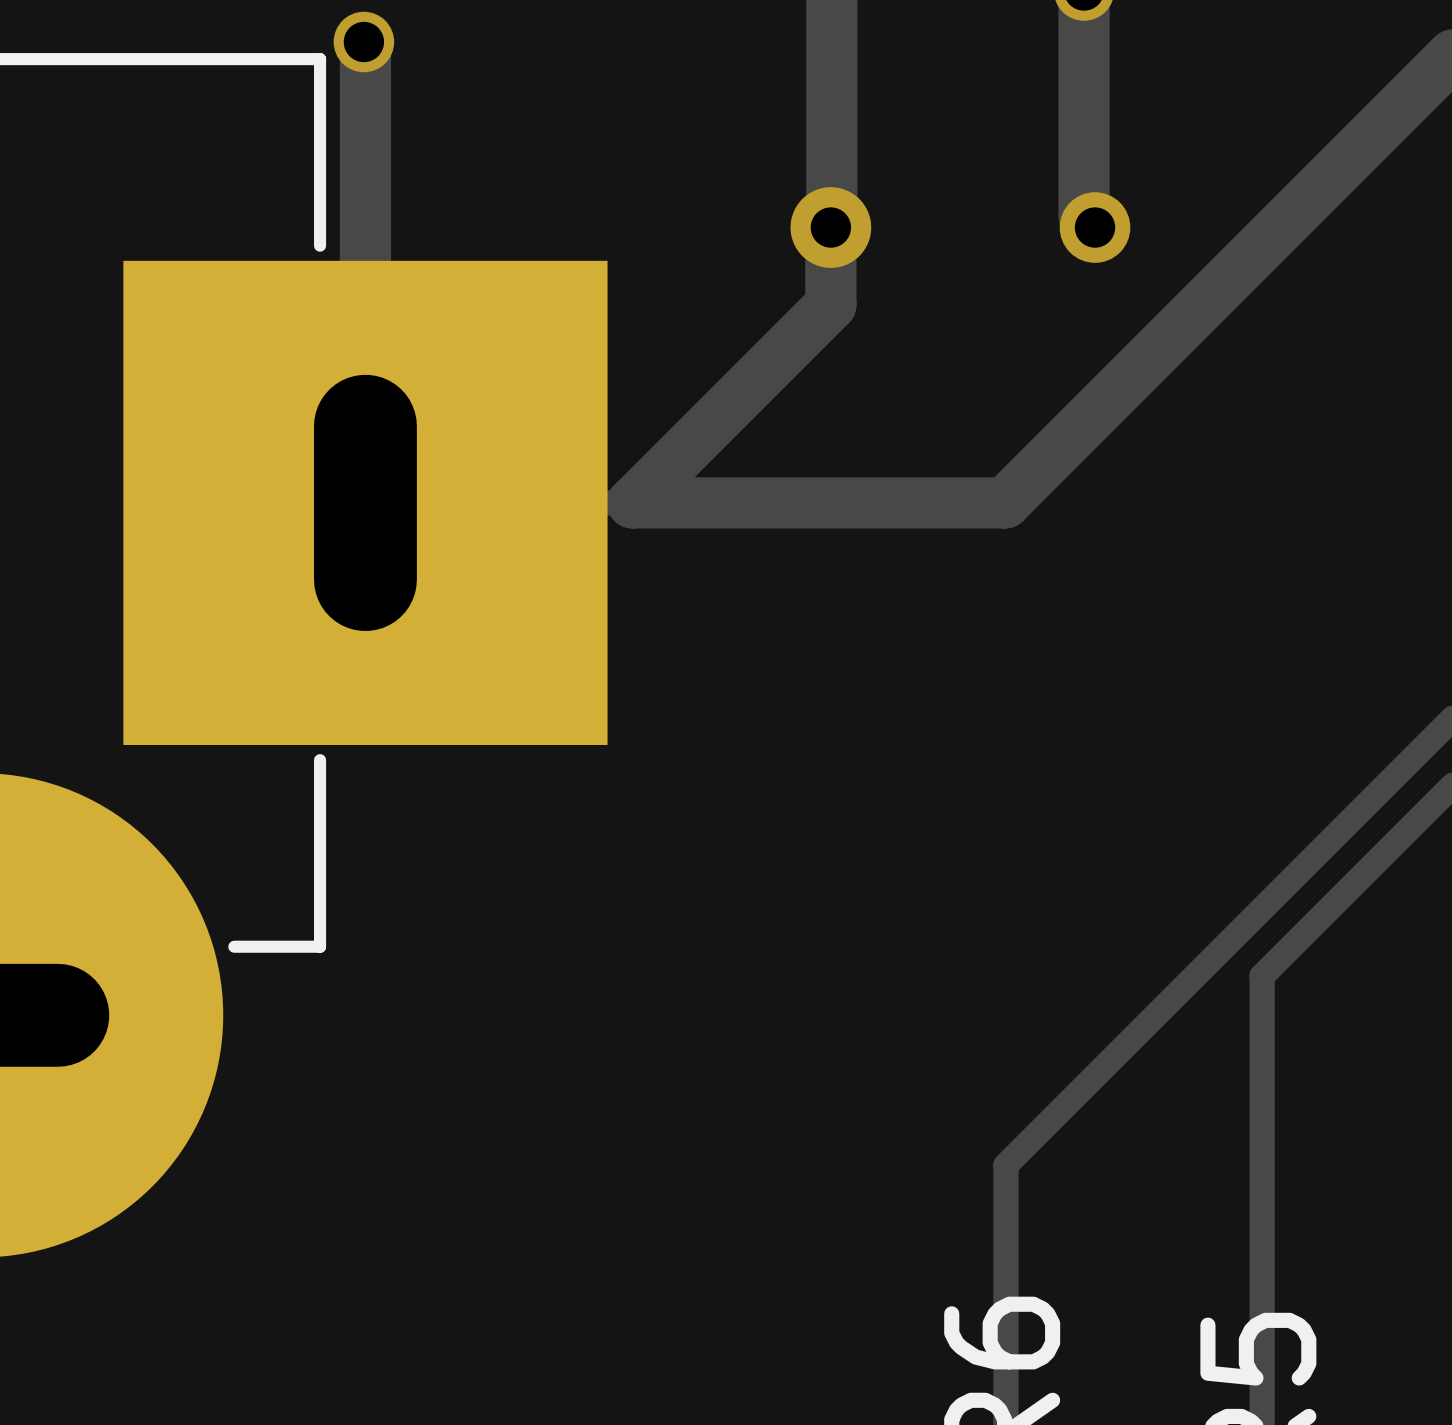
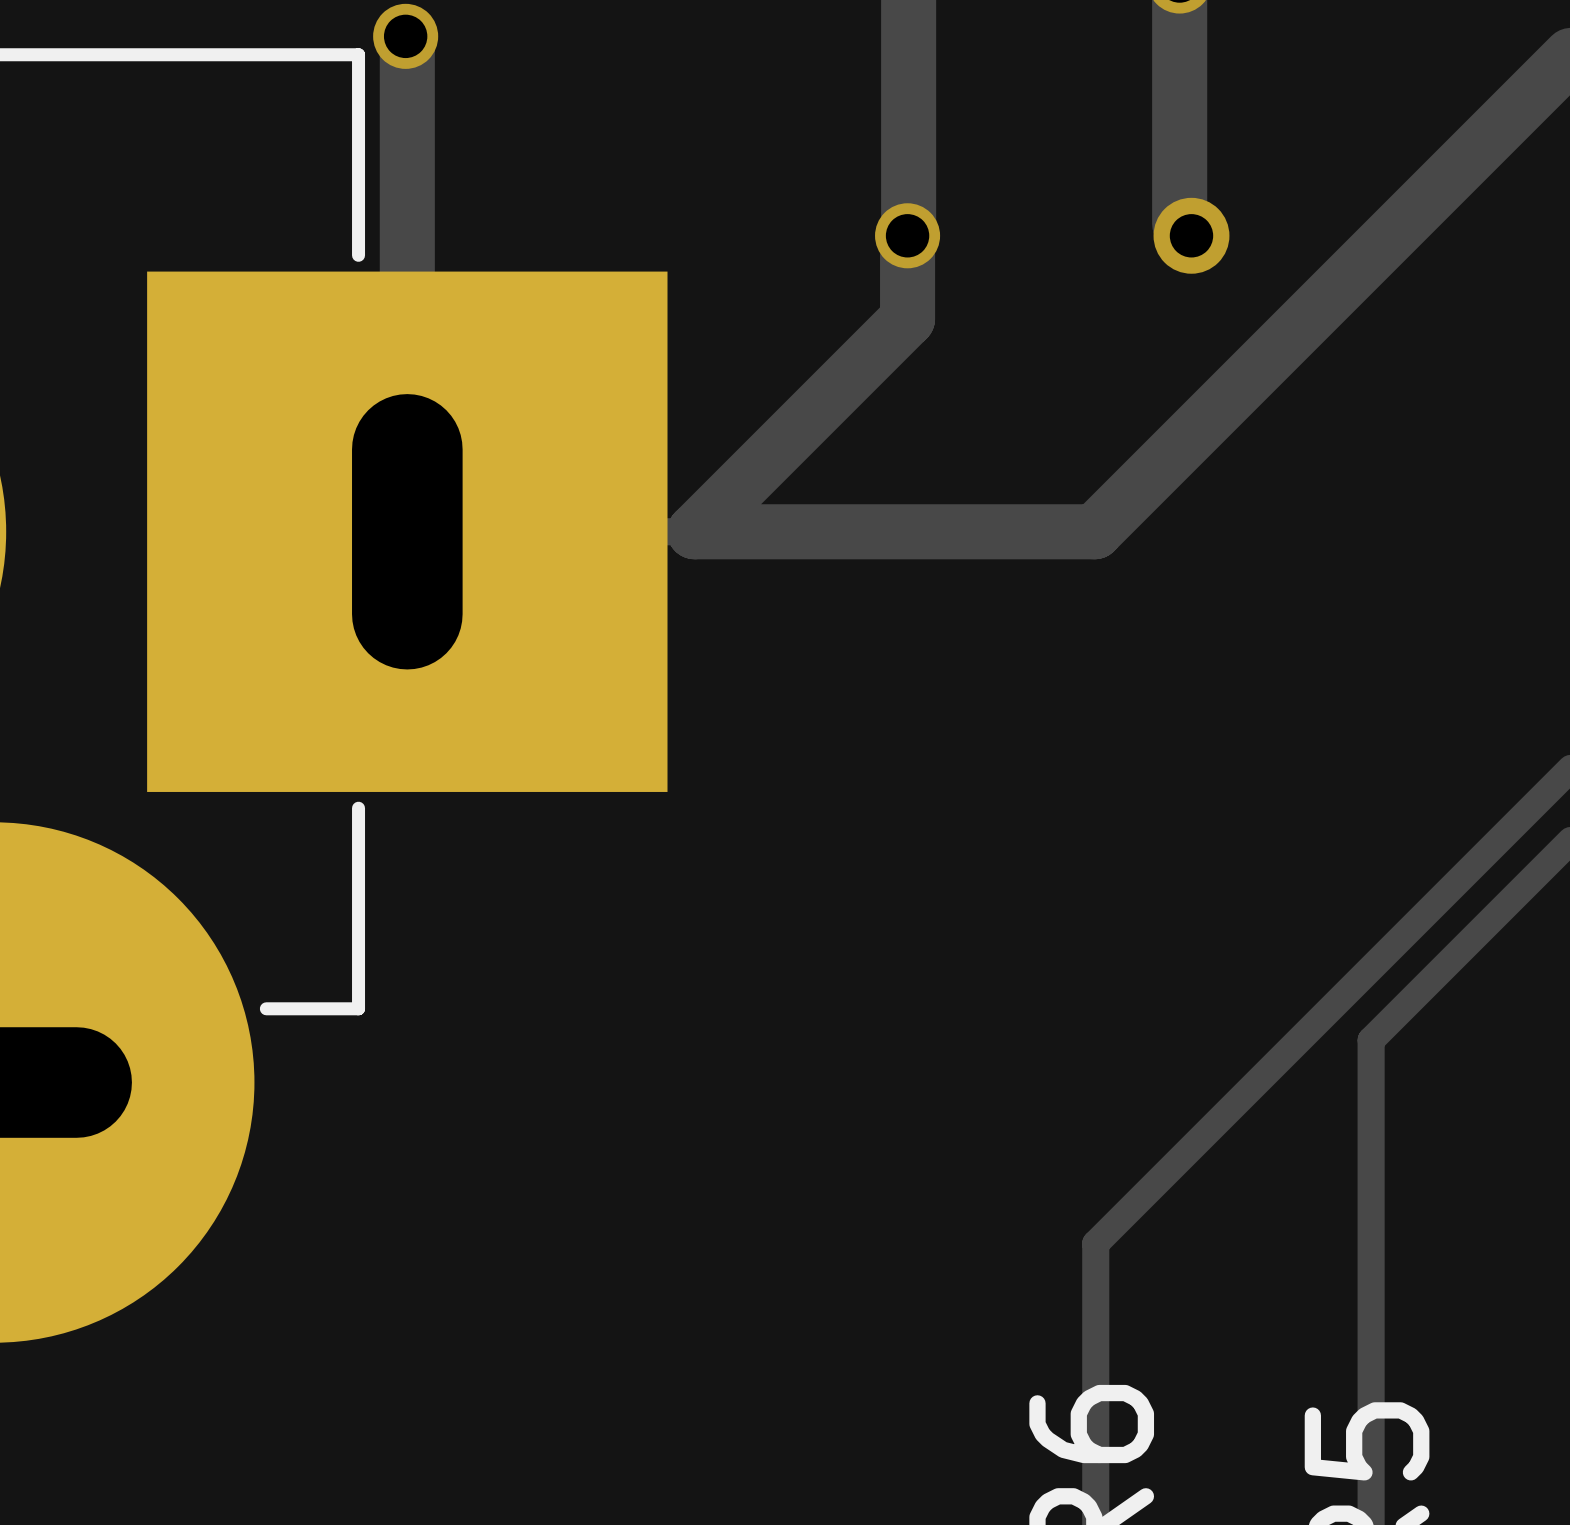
via size: [790, 187, 872, 268] -> [875, 203, 941, 269]

